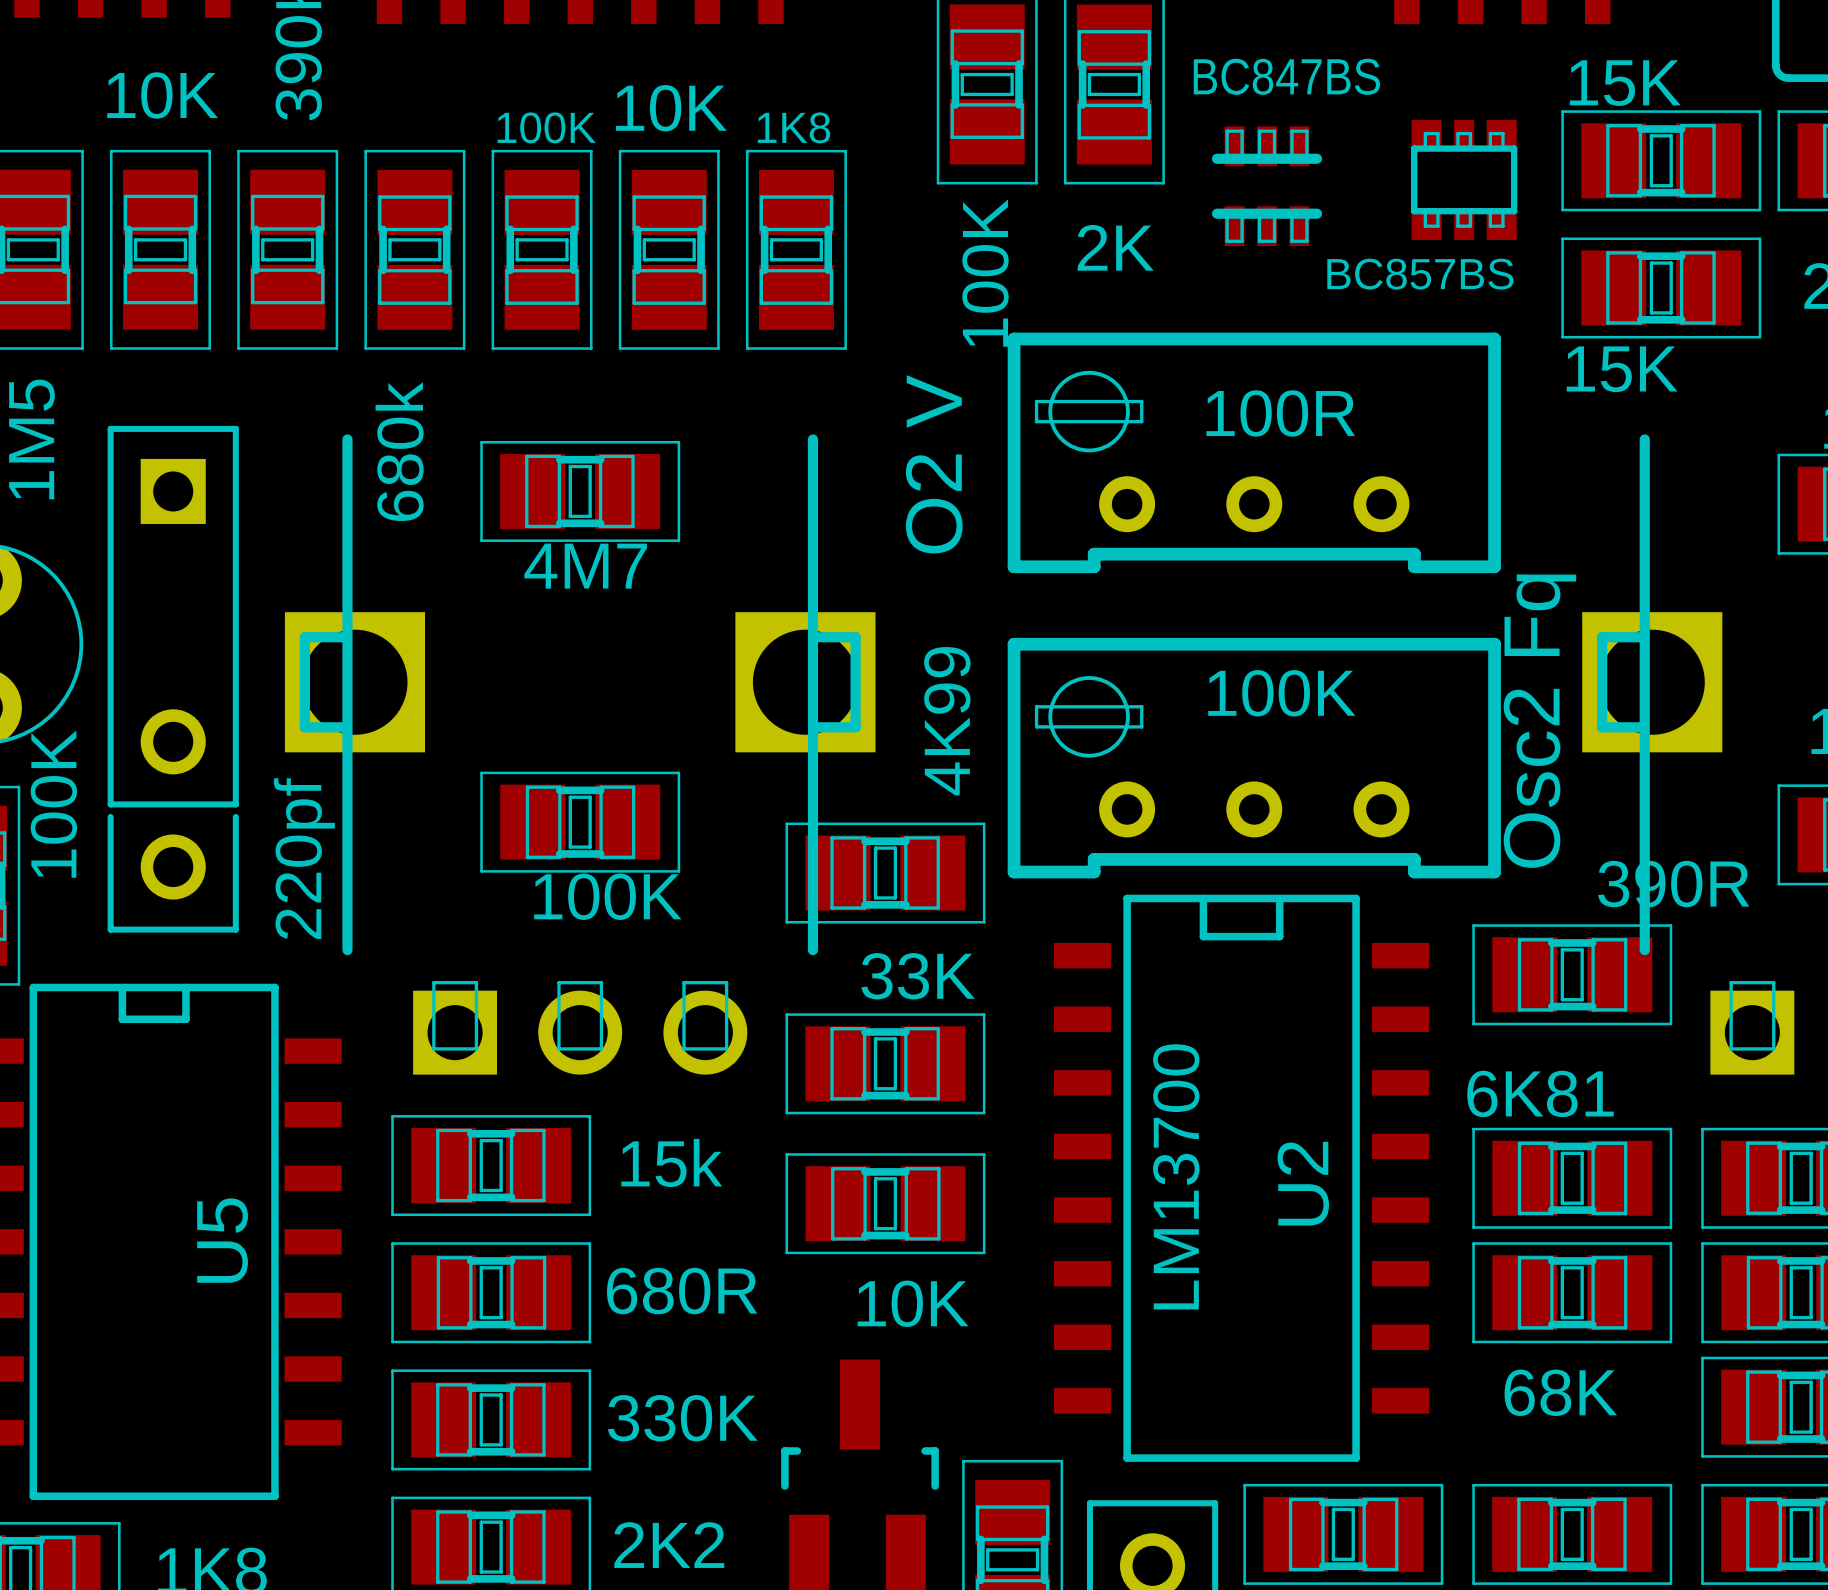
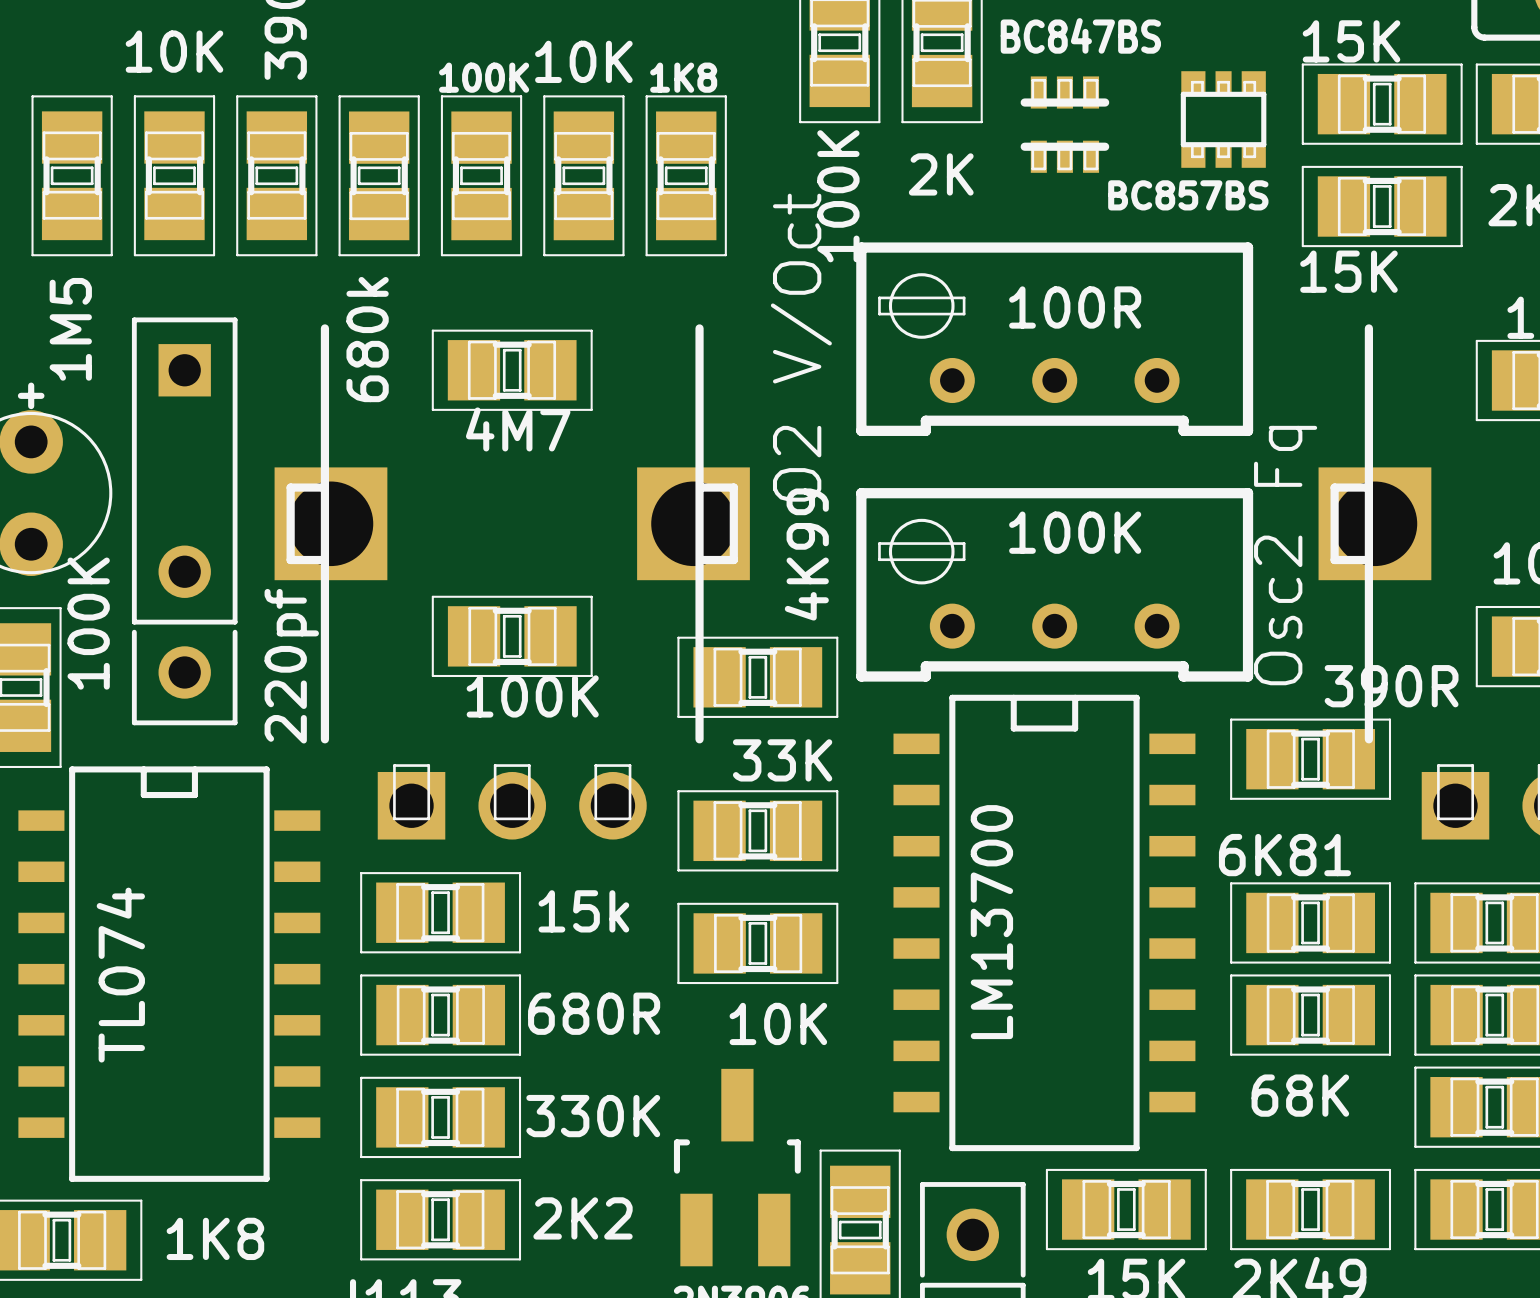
text: O2 V (934, 464) -> O2 V/Oct (801, 347)
U2 name: U2 (1303, 1183) -> none
U5 name: U5 (222, 1240) -> none
U5 value: none -> TL074 (120, 975)

